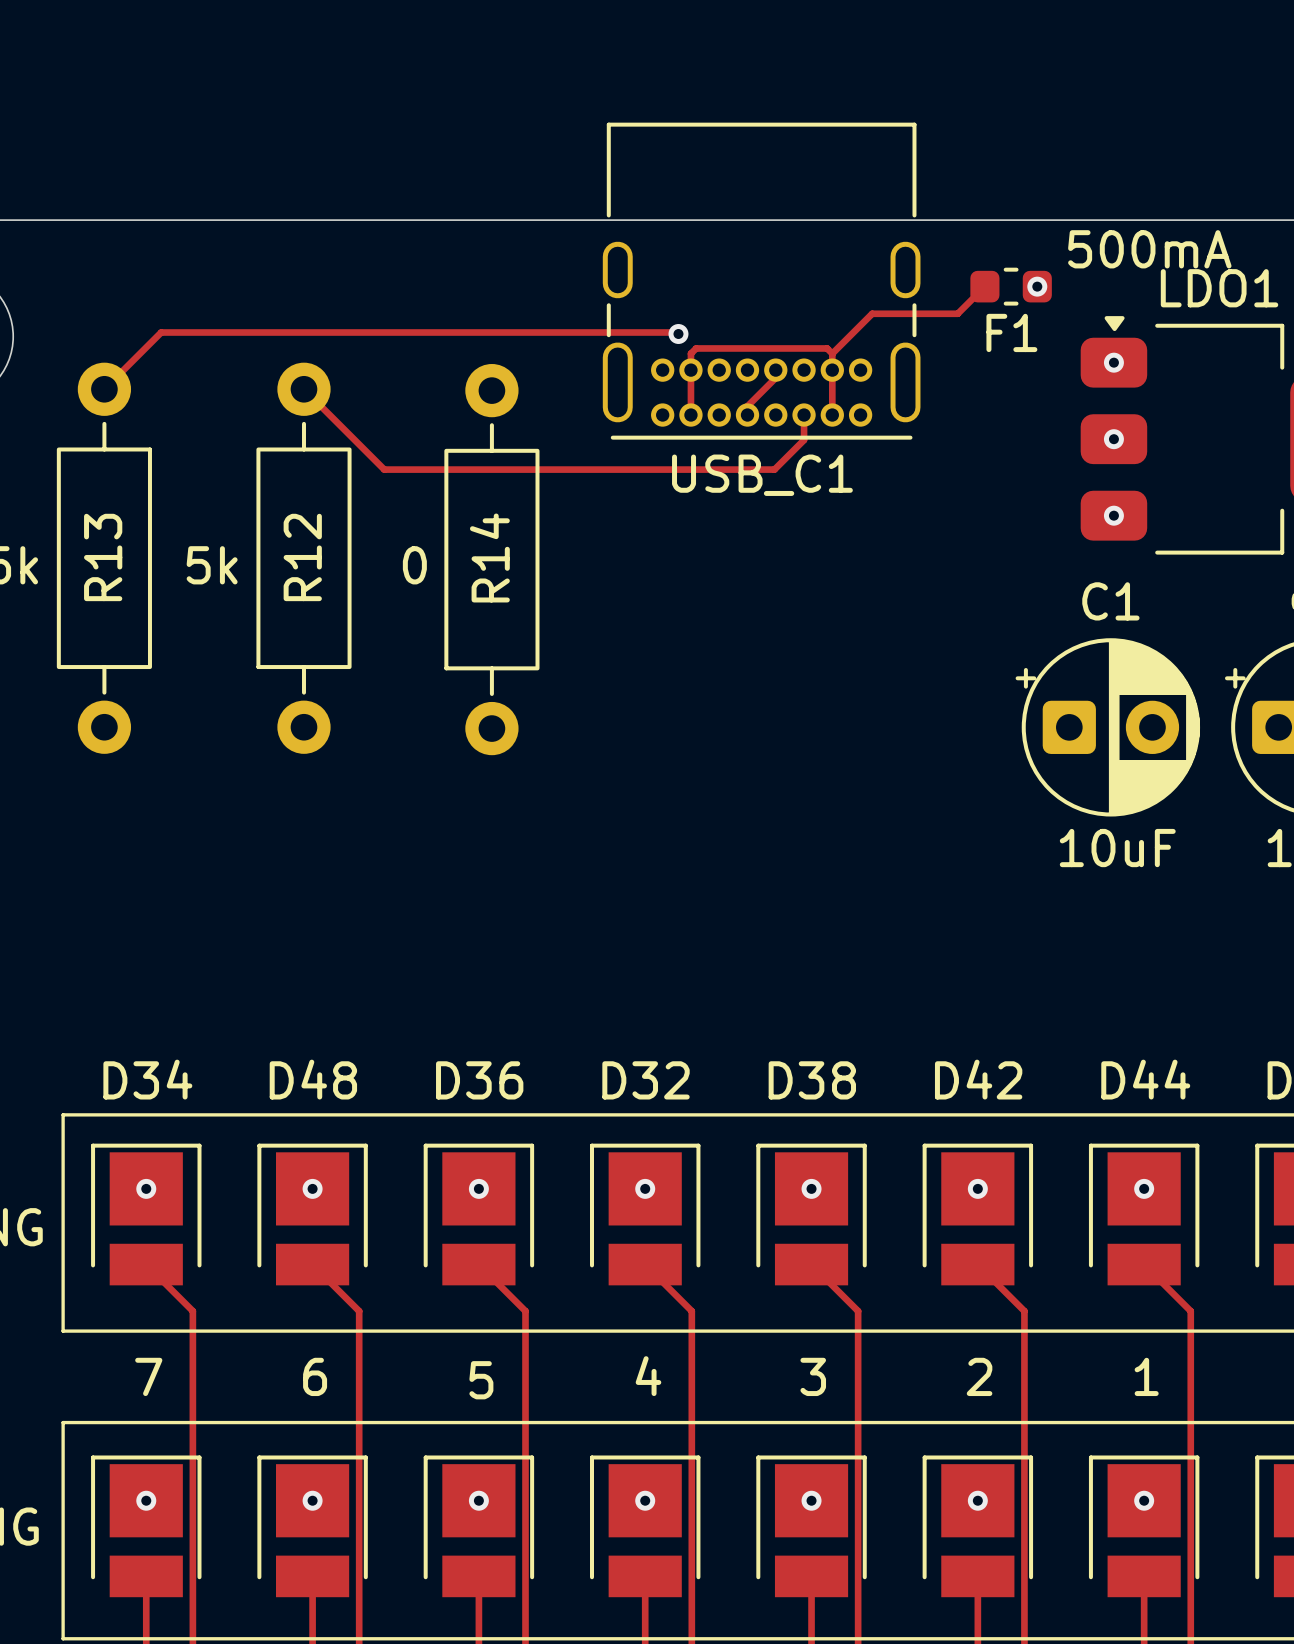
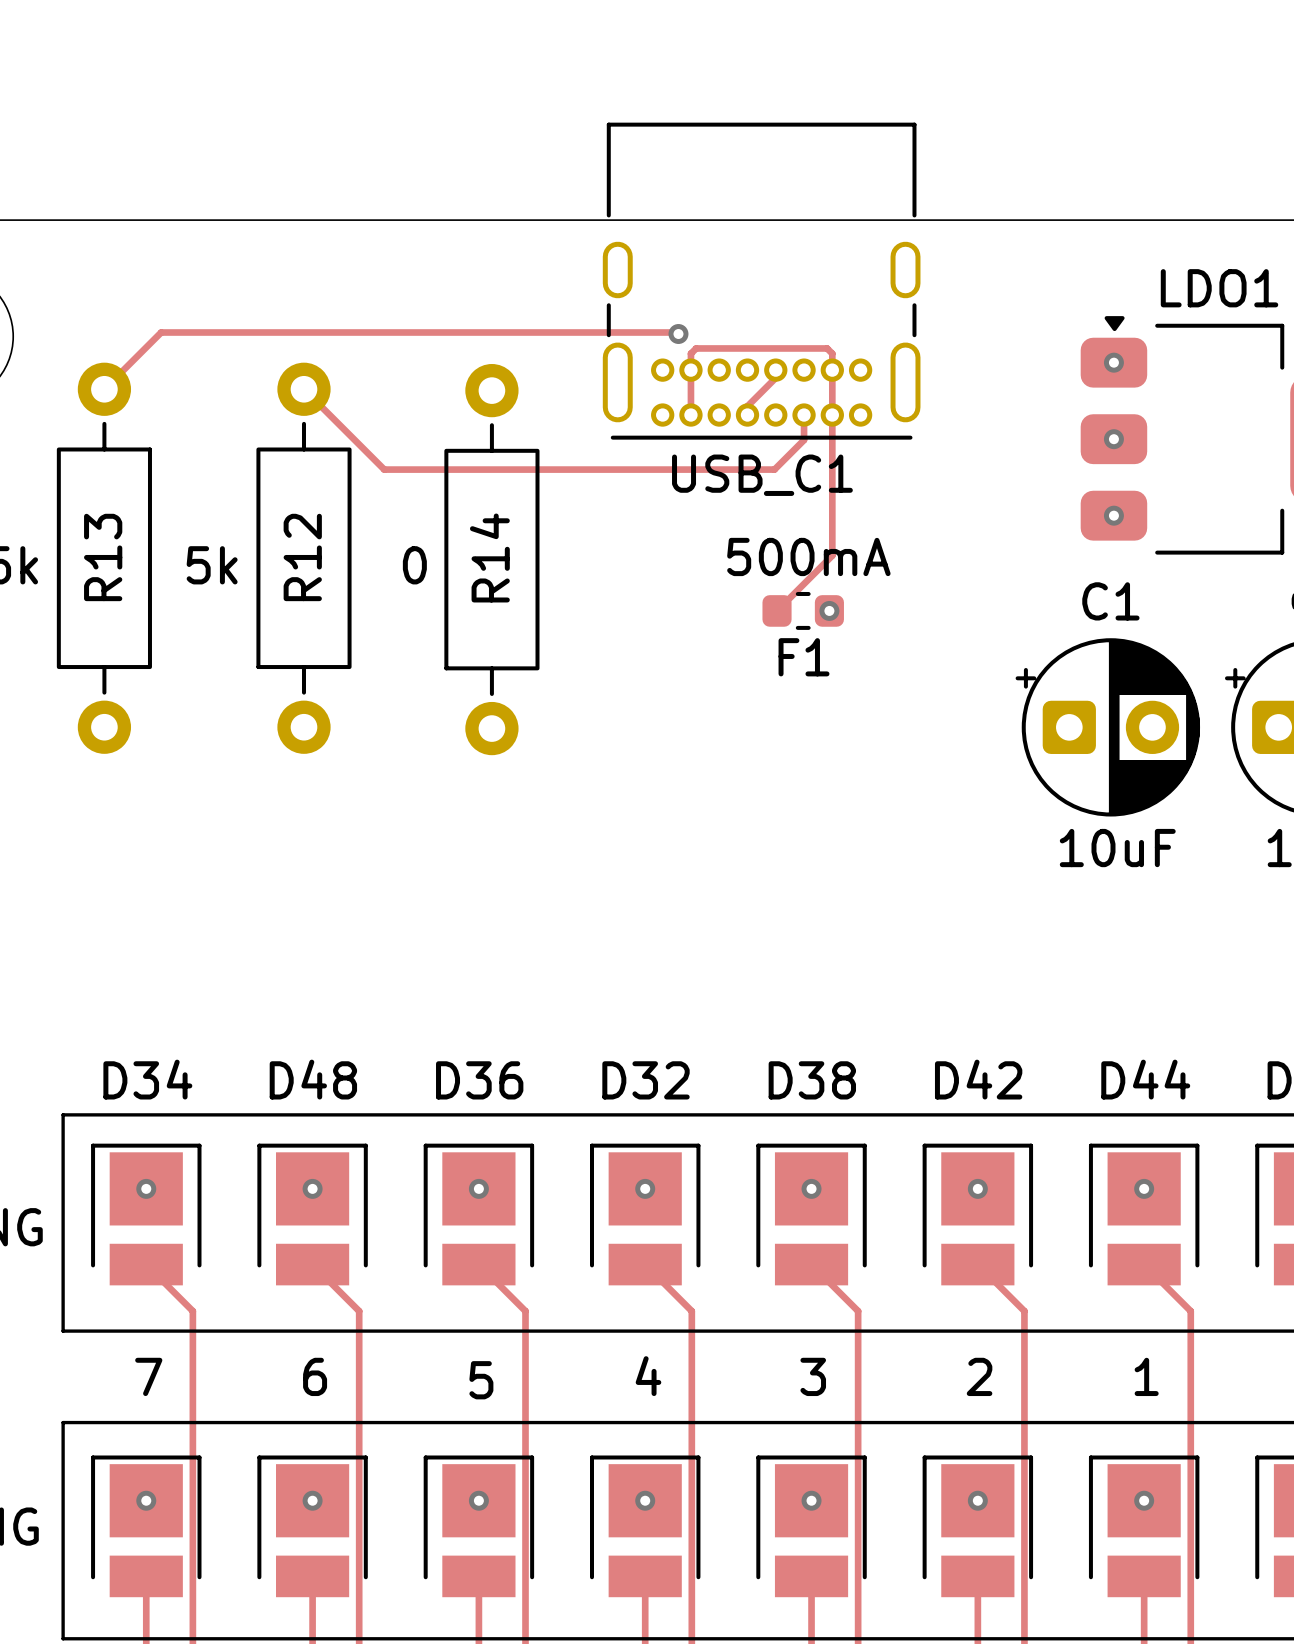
text position: 500mA (1149, 249) -> 500mA (808, 556)
track: (984, 286) (957, 313) (872, 313) (832, 353) -> none
F1 position: (1011, 286) -> (803, 610)
via: (1037, 286) -> none
track: none -> (832, 415) (832, 555) (777, 610)
via: none -> (829, 610)

